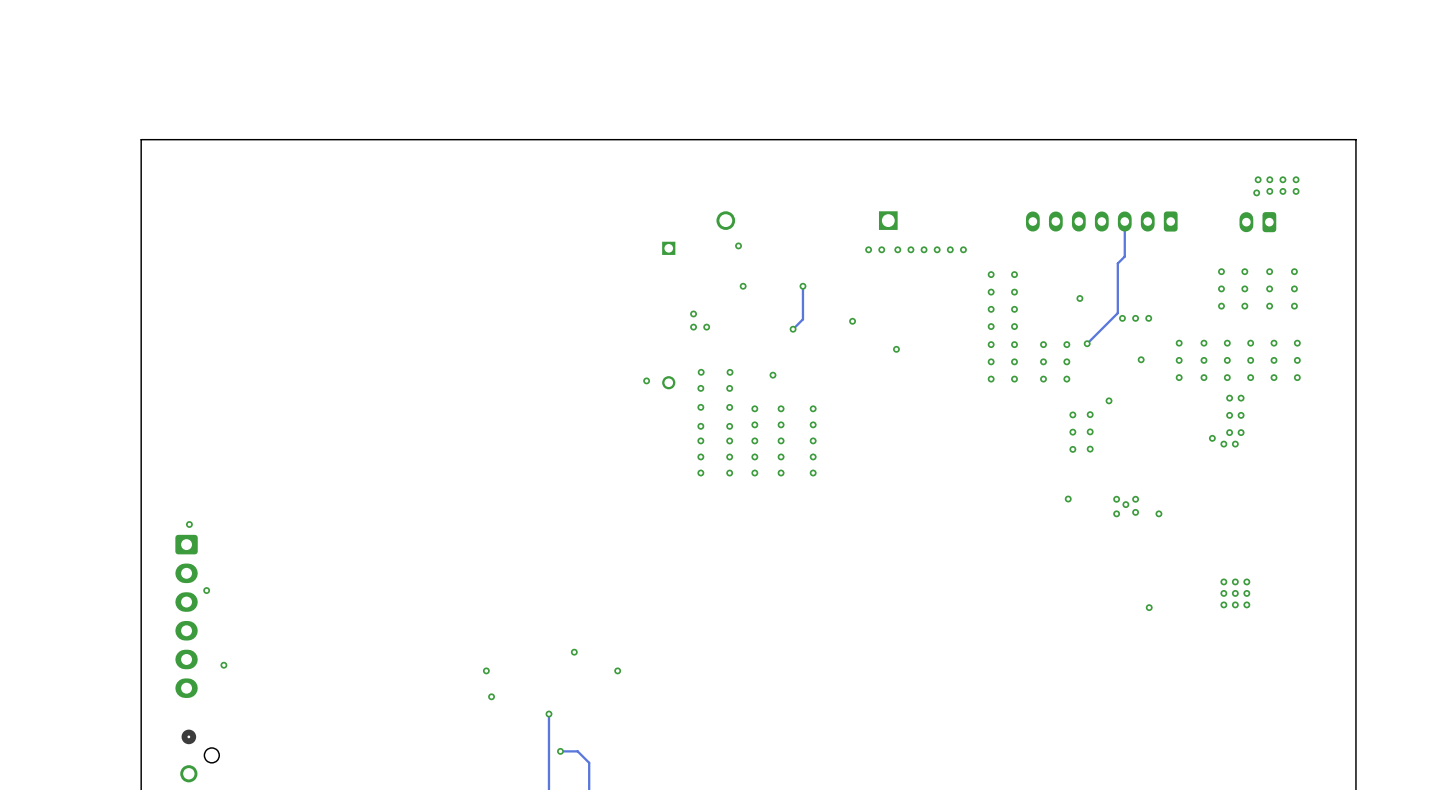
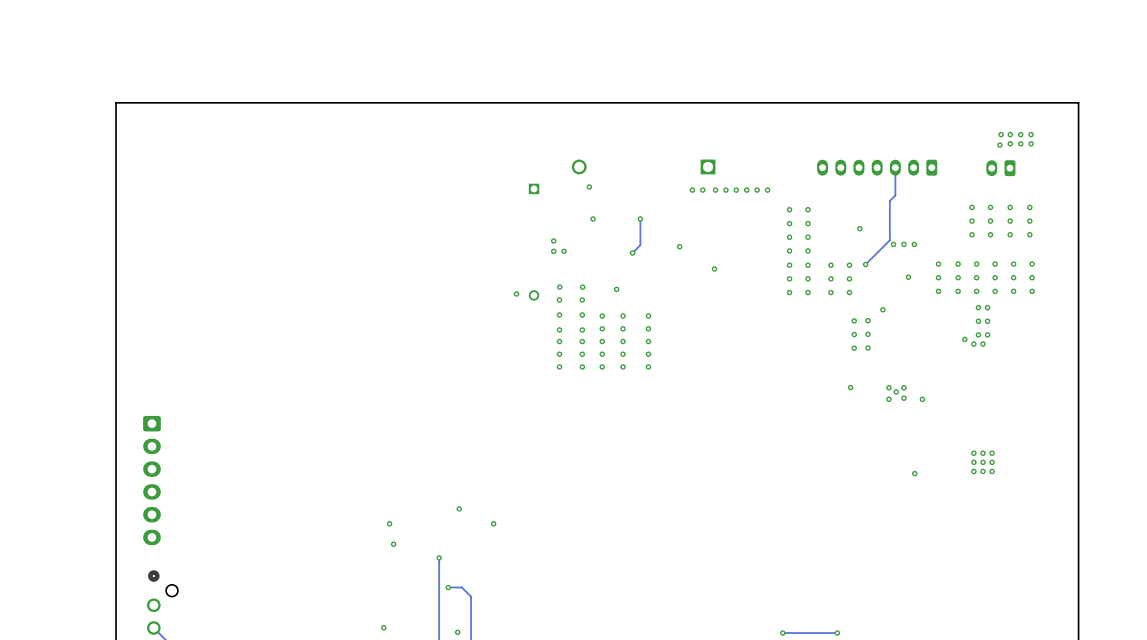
via: (189, 524) -> none
via: (206, 590) -> none
via: (223, 665) -> none

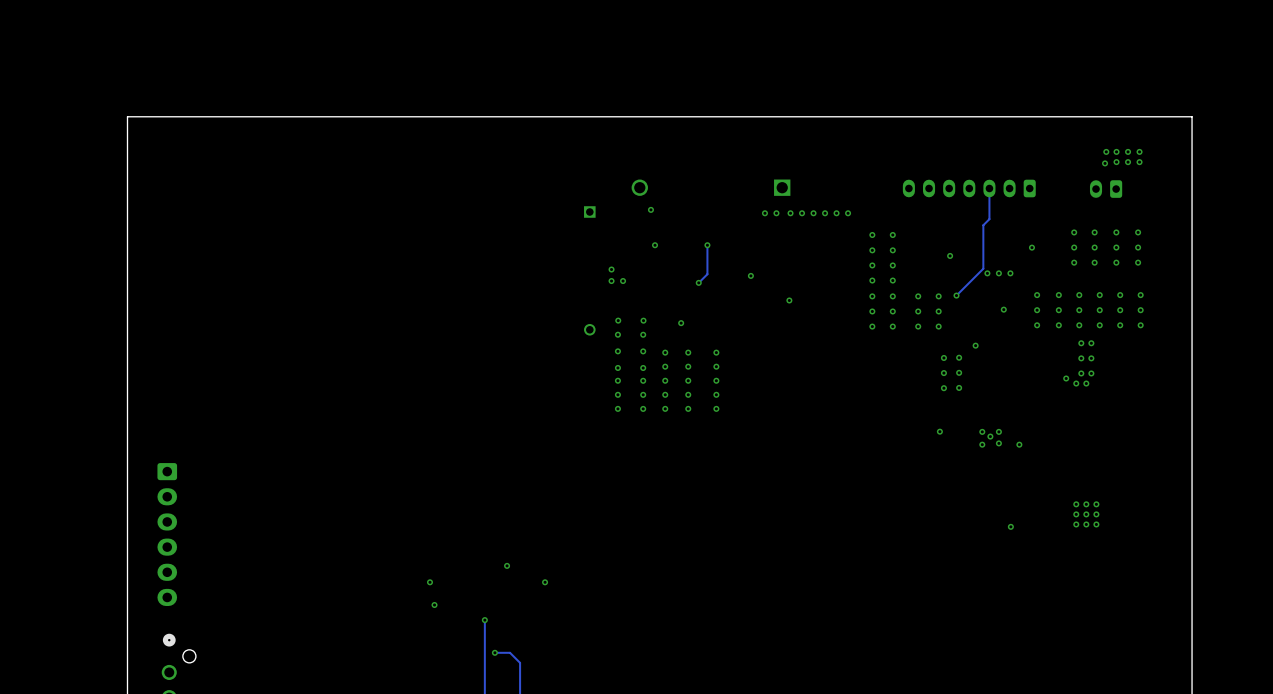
via: none -> (1031, 247)
via: (516, 293) -> none

